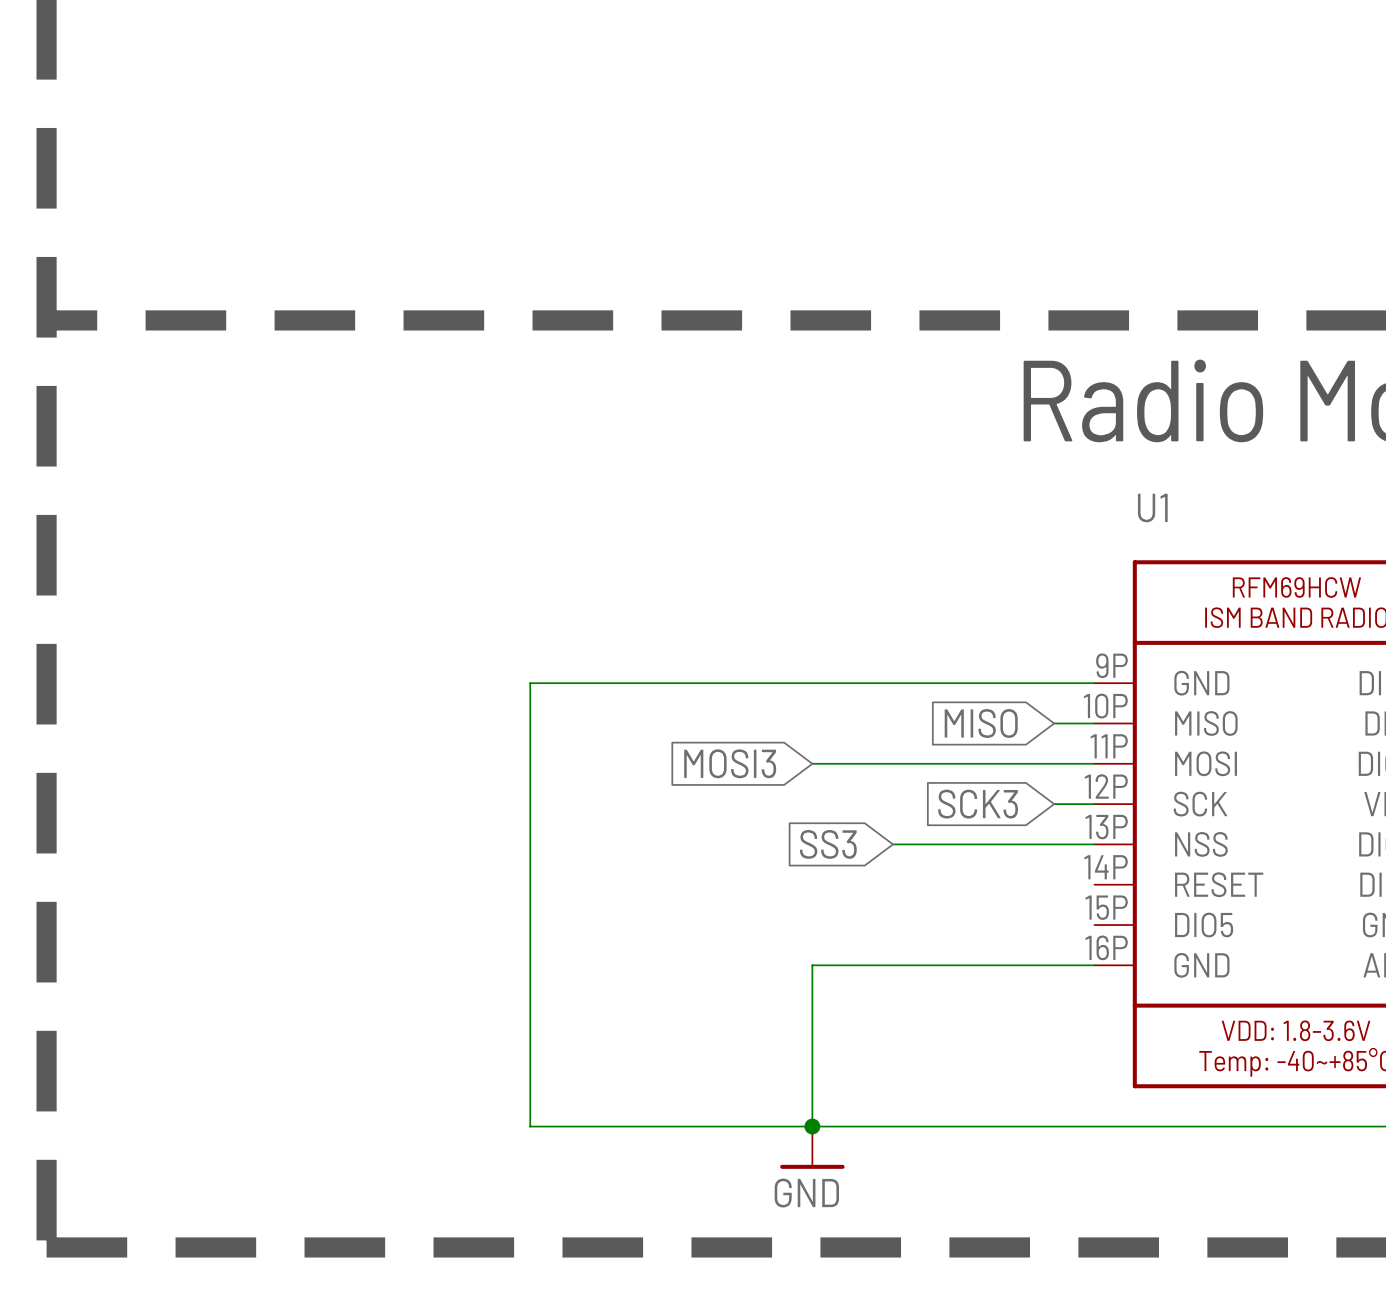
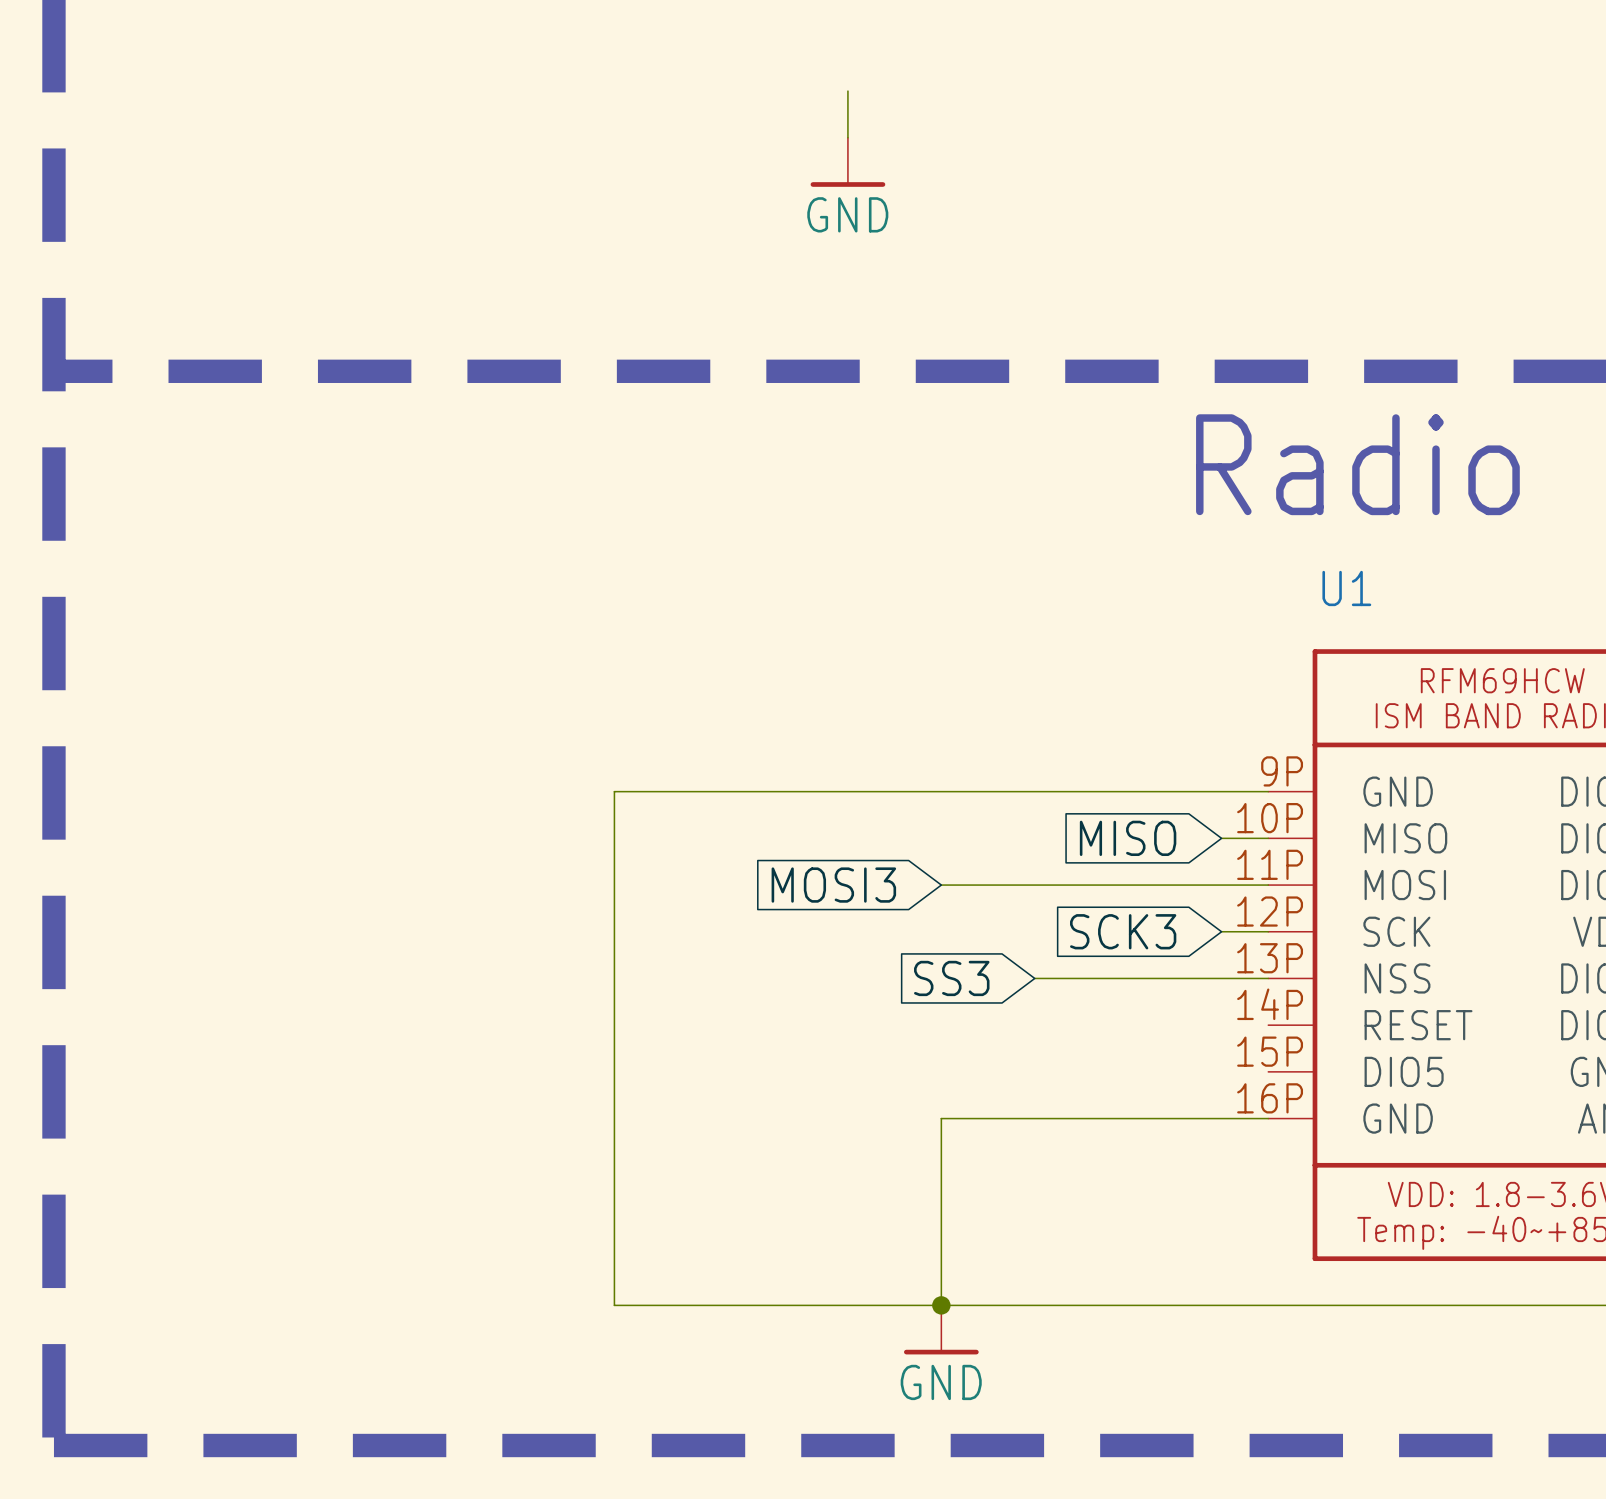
wire: none -> (847, 91) (847, 137)
power symbol: none -> GND (847, 162)

